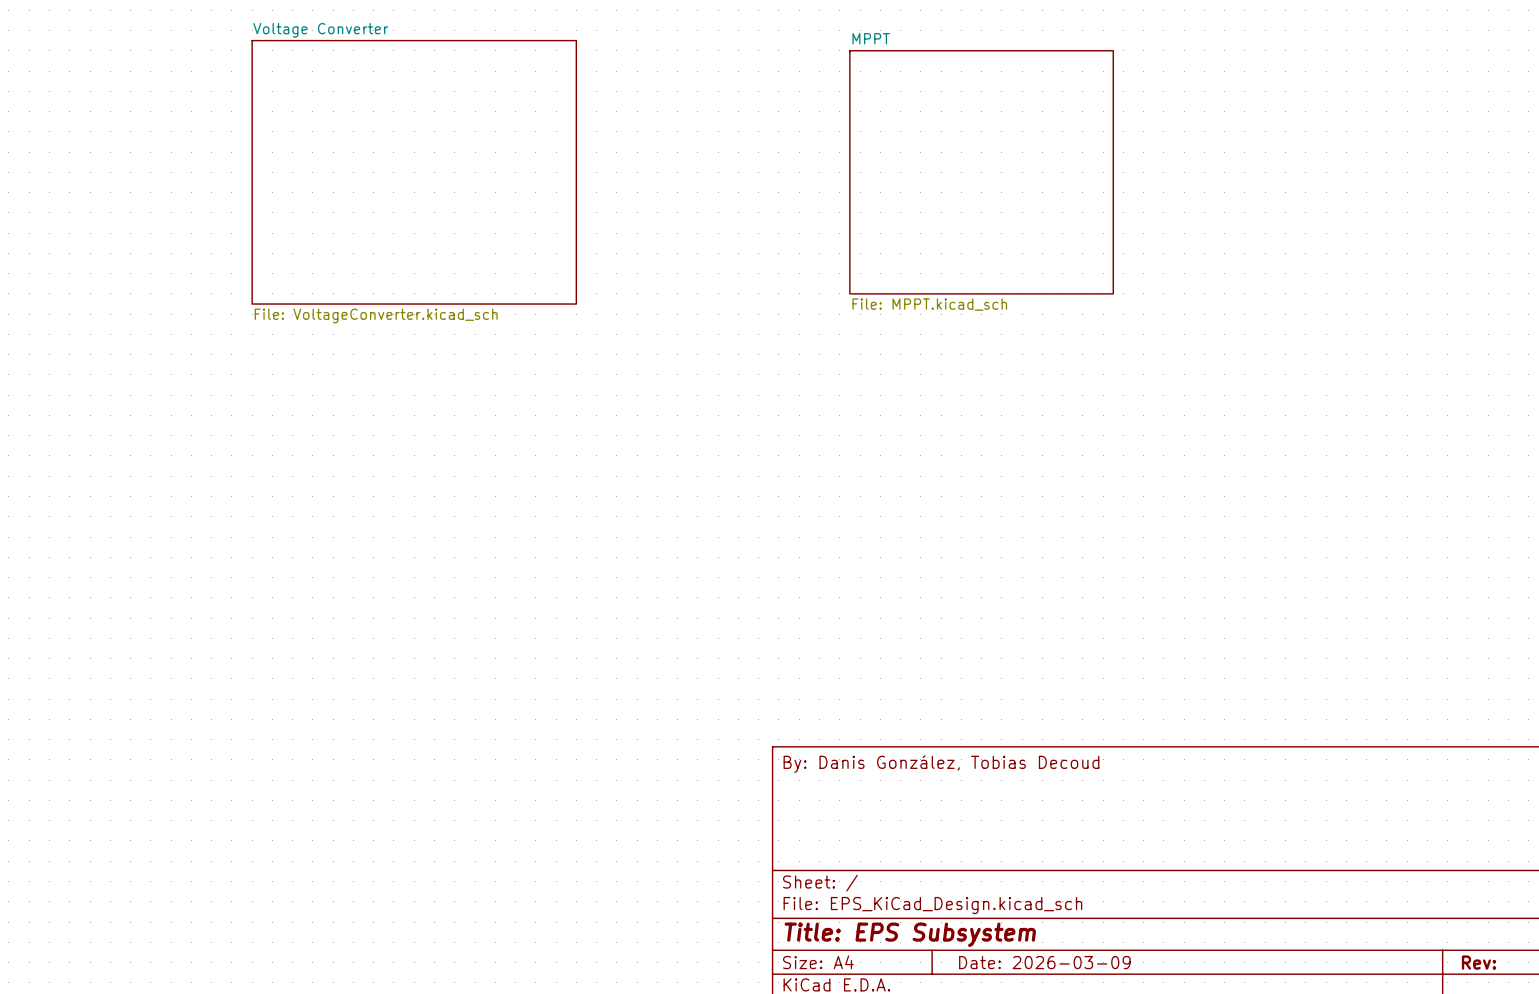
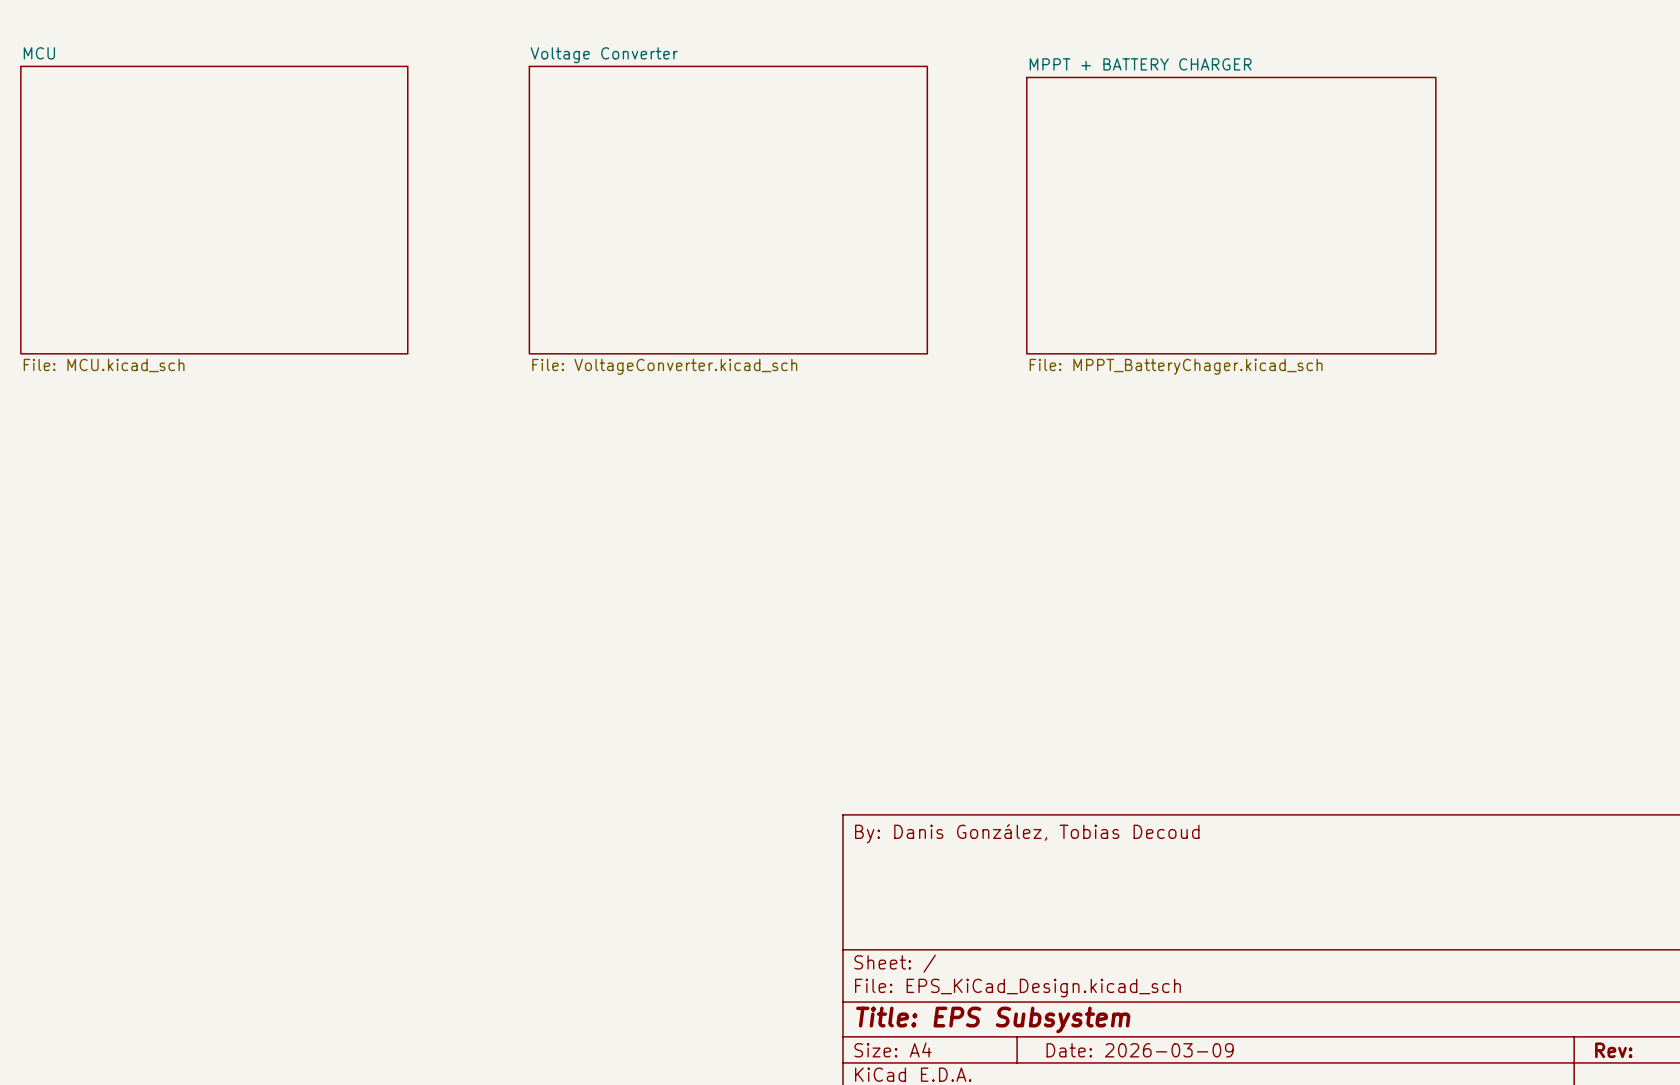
sheet Voltage Converter: File: VoltageConverter.kicad_sch (414, 172) -> none
sheet MPPT: File: MPPT.kicad_sch (981, 172) -> none
sheet MCU: none -> File: MCU.kicad_sch (214, 210)
sheet Voltage Converter: none -> File: VoltageConverter.kicad_sch (728, 210)
sheet MPPT + BATTERY CHARGER: none -> File: MPPT_BatteryChager.kicad_sch (1231, 215)

